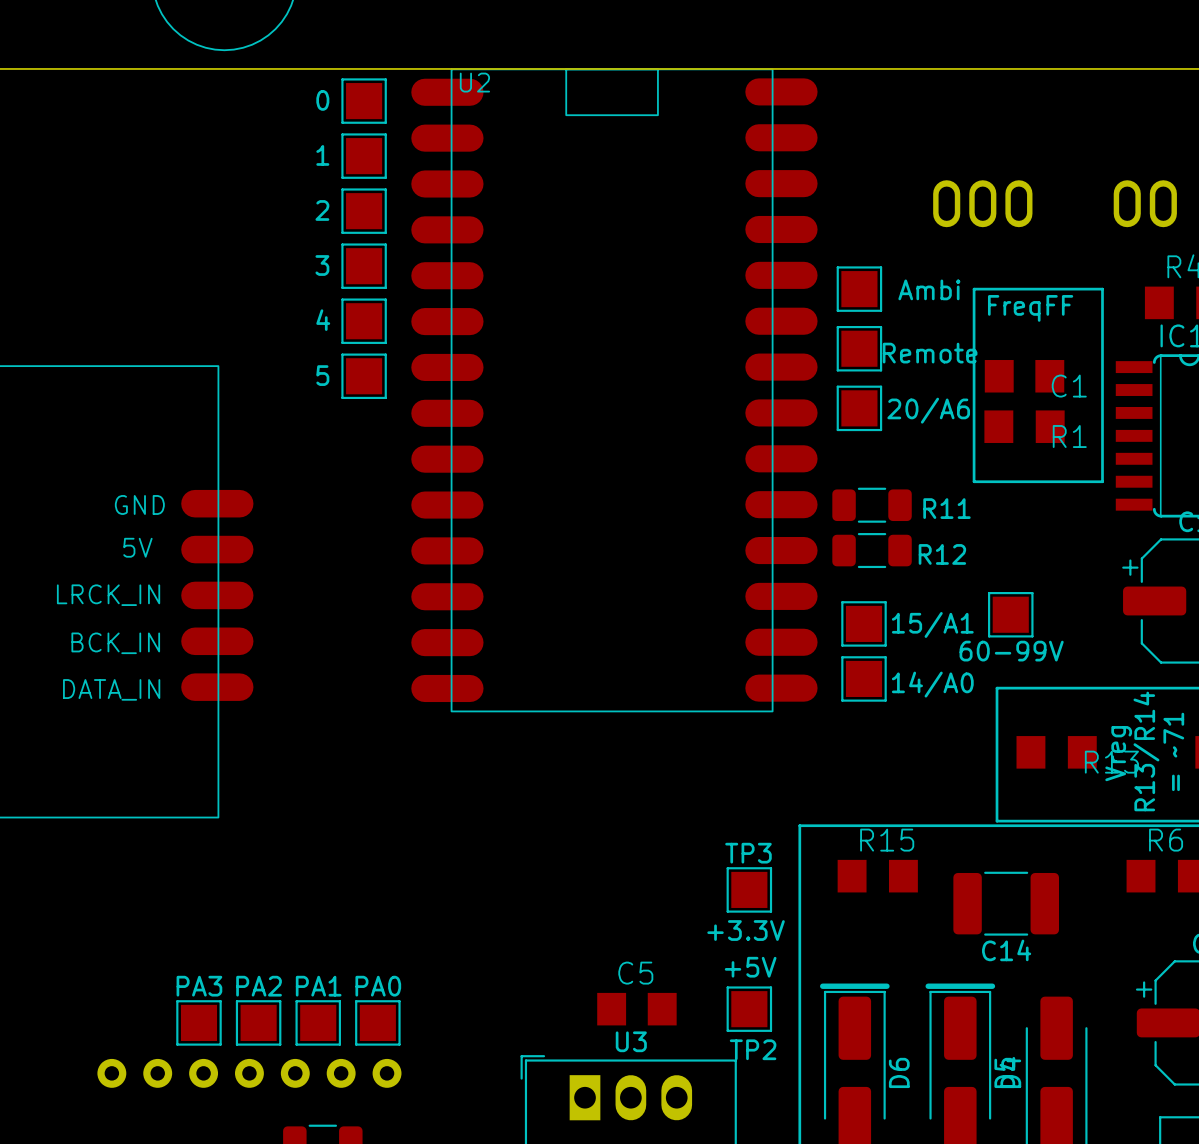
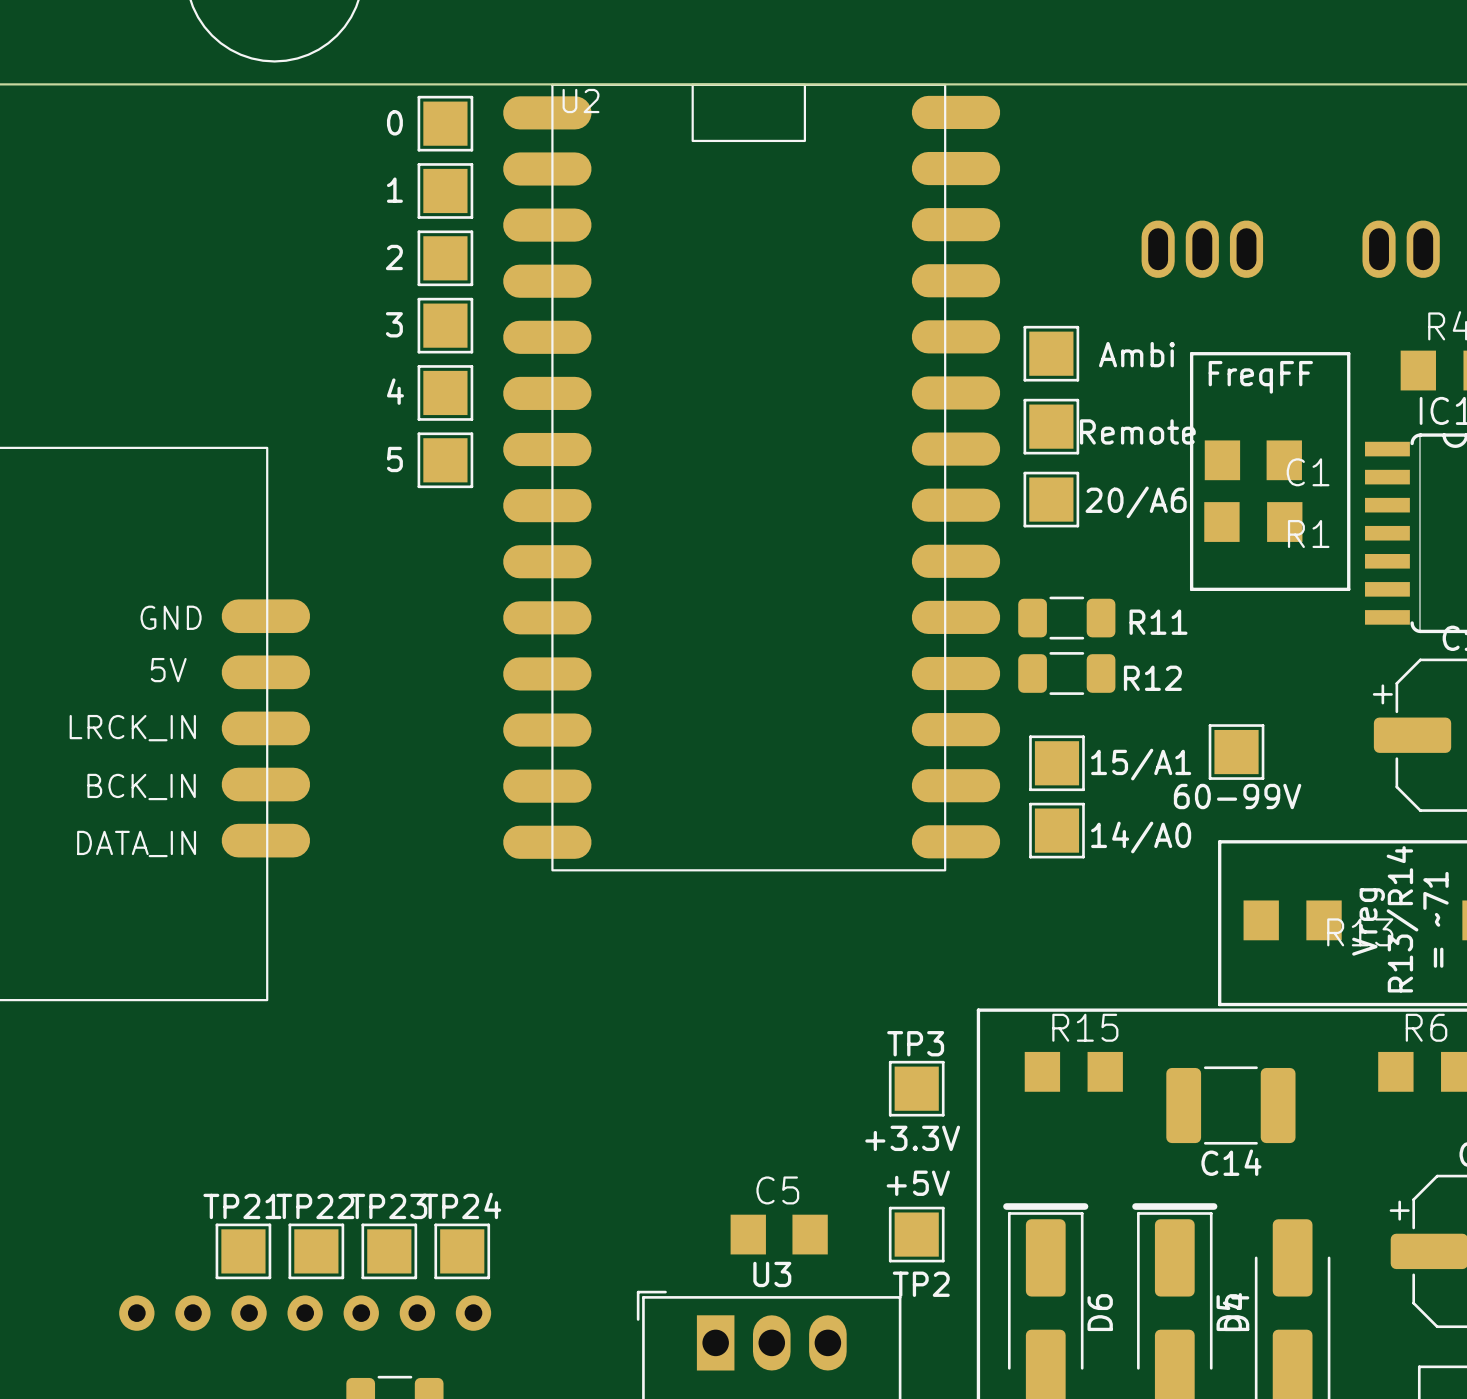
PA3 name: PA3 (199, 986) -> TP21 (242, 1206)
PA2 name: PA2 (259, 986) -> TP22 (315, 1206)
PA1 name: PA1 (318, 986) -> TP23 (388, 1206)
PA0 name: PA0 (378, 986) -> TP24 (461, 1205)

